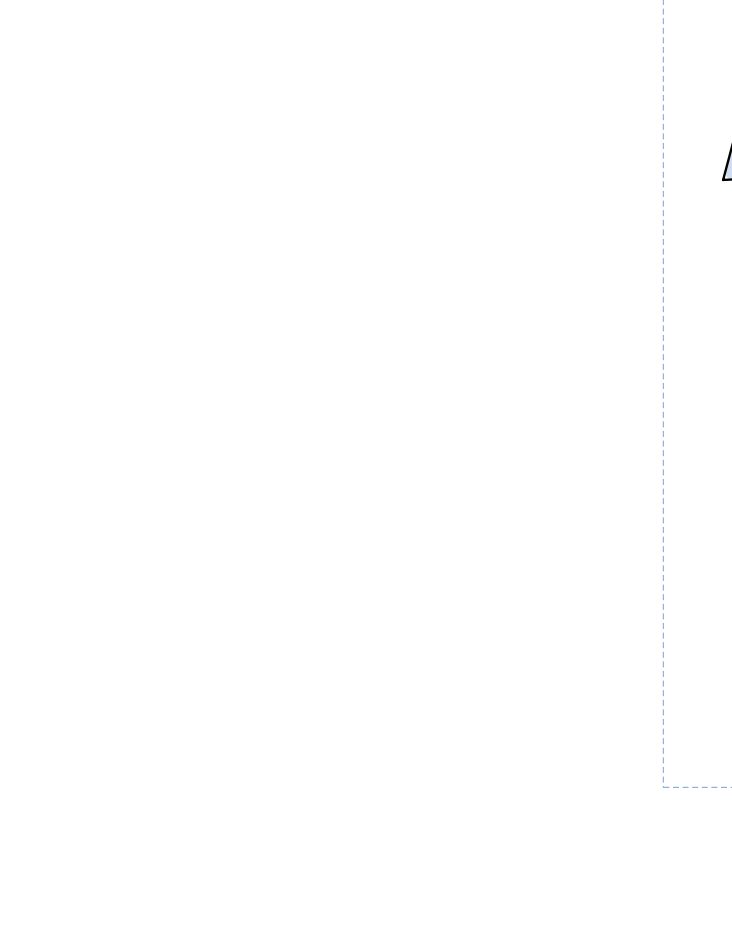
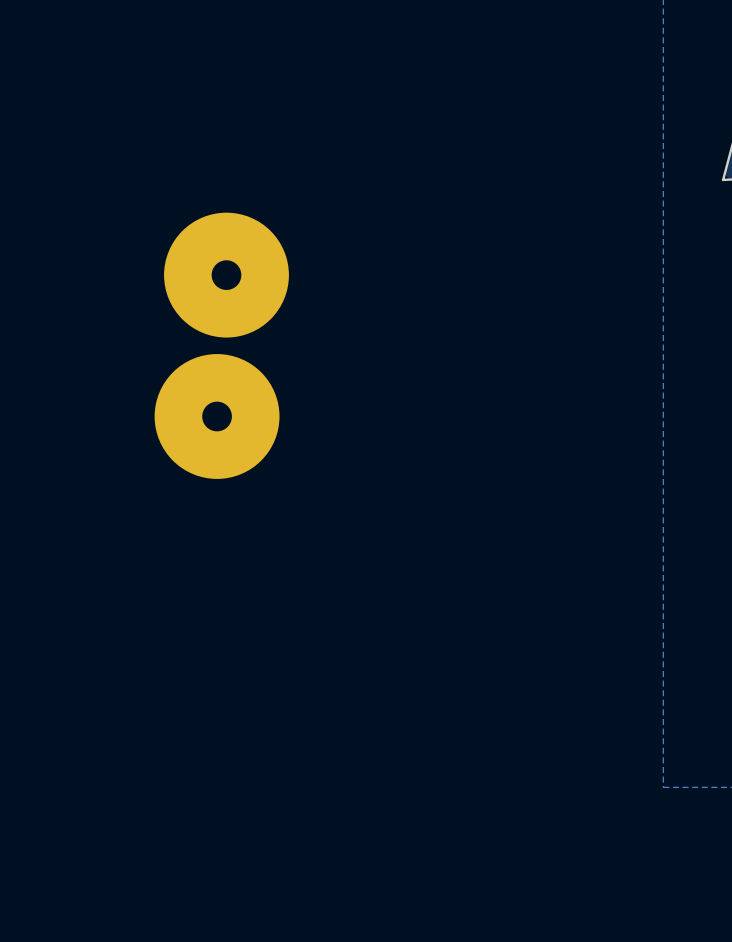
part: none -> (226, 275)
part: none -> (217, 416)

